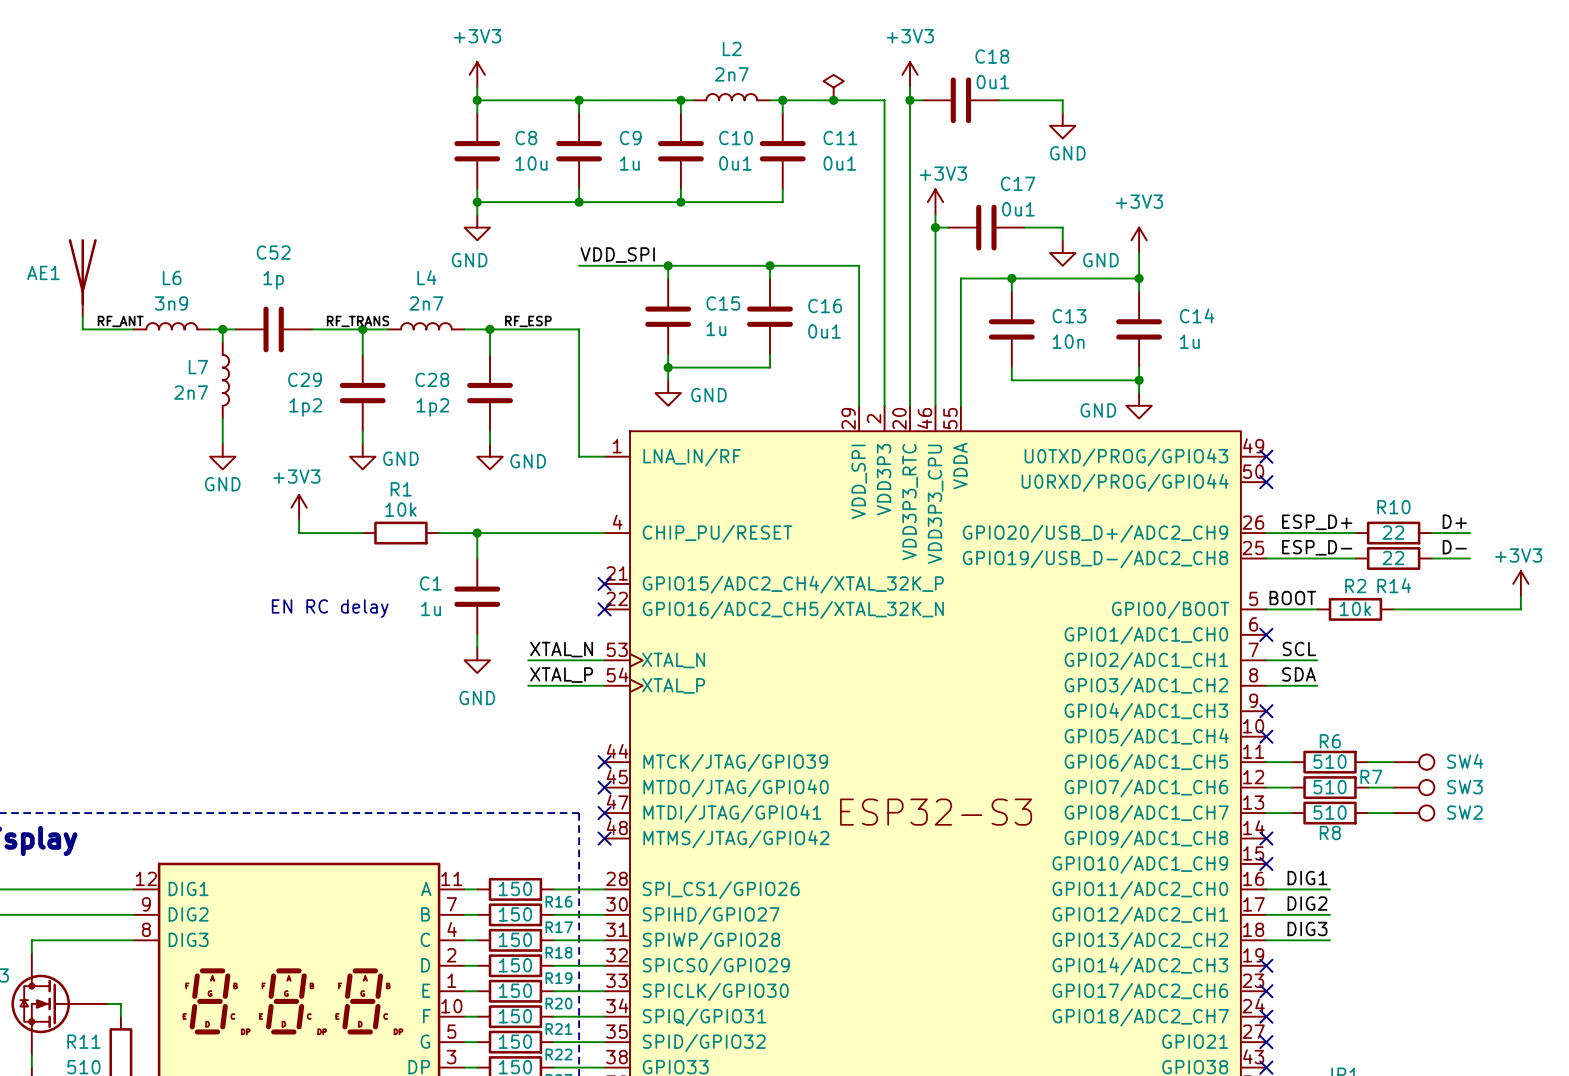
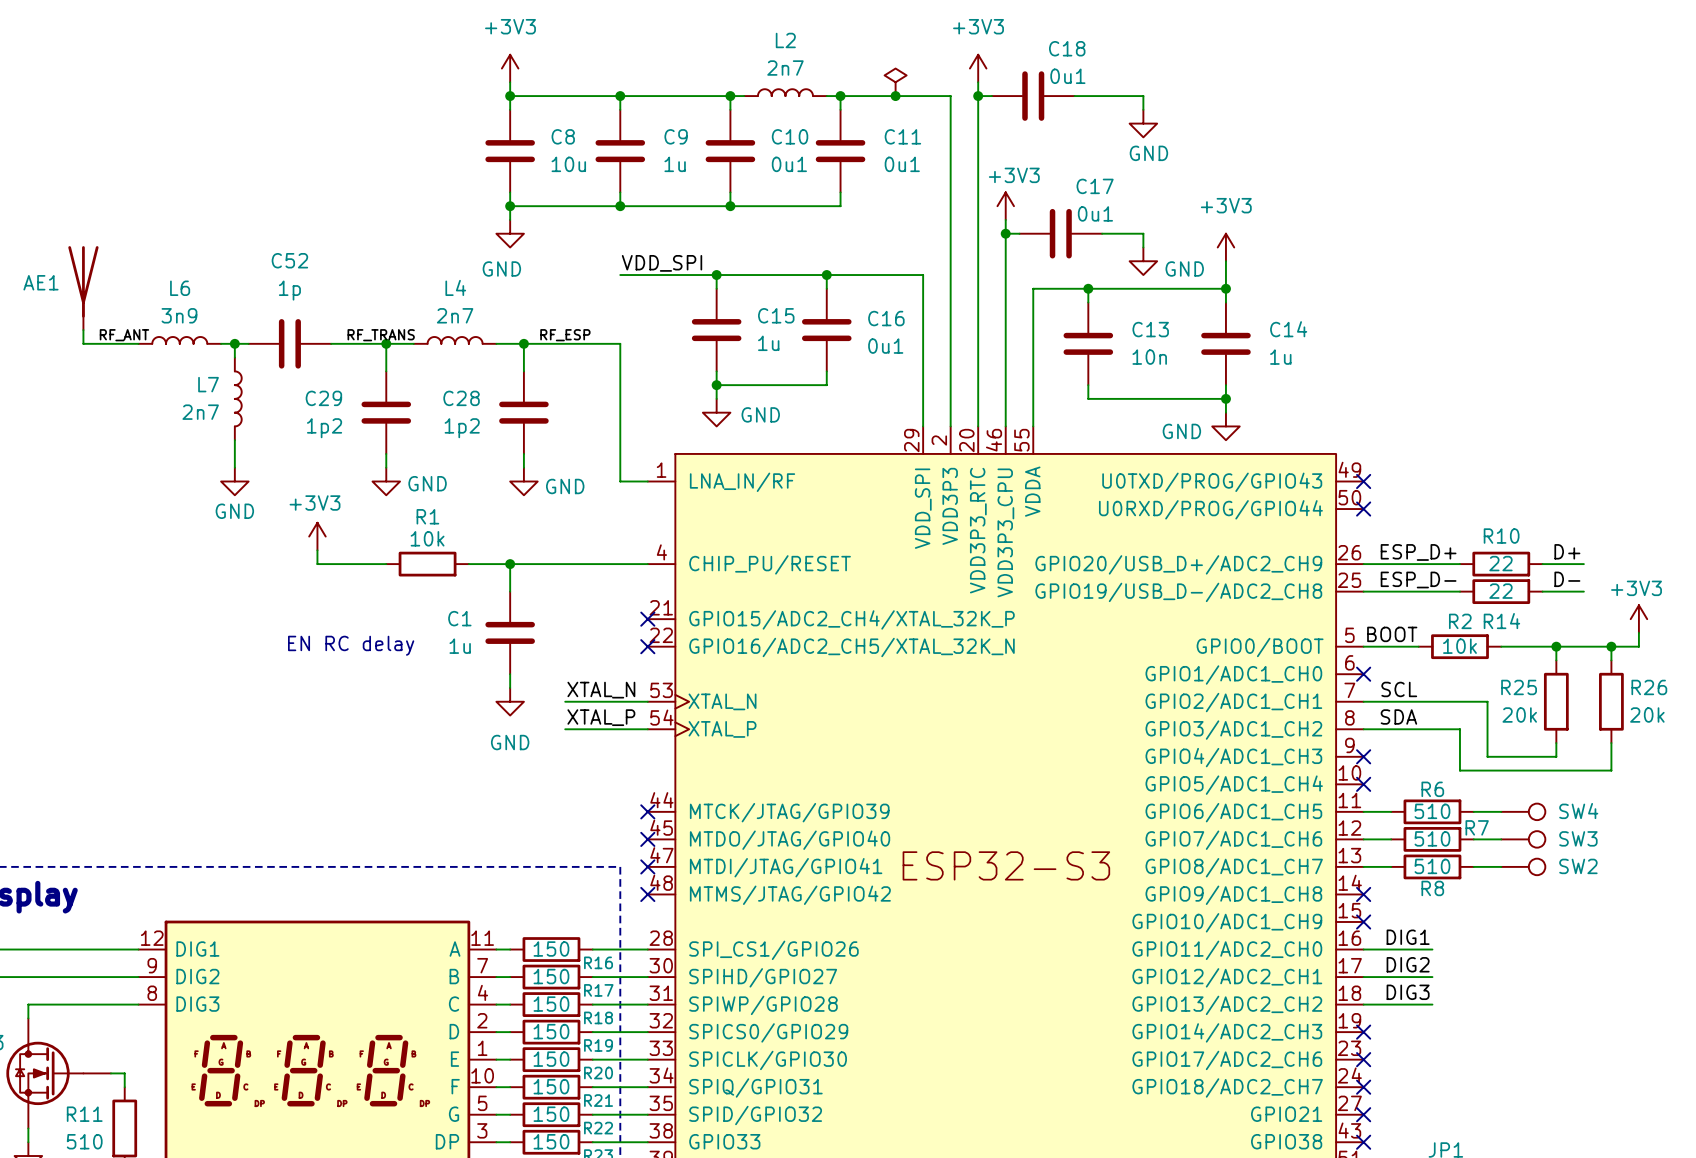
wire: none -> (1556, 646) (1556, 660)
junction: none -> (1556, 646)
wire: none -> (1611, 646) (1611, 660)
junction: none -> (1611, 646)
wire: none -> (1418, 701) (1487, 701) (1487, 756) (1556, 756) (1556, 743)
R25: none -> 20k (1556, 701)
R26: none -> 20k (1611, 701)
wire: none -> (1418, 729) (1459, 729) (1459, 770) (1611, 770) (1611, 743)

